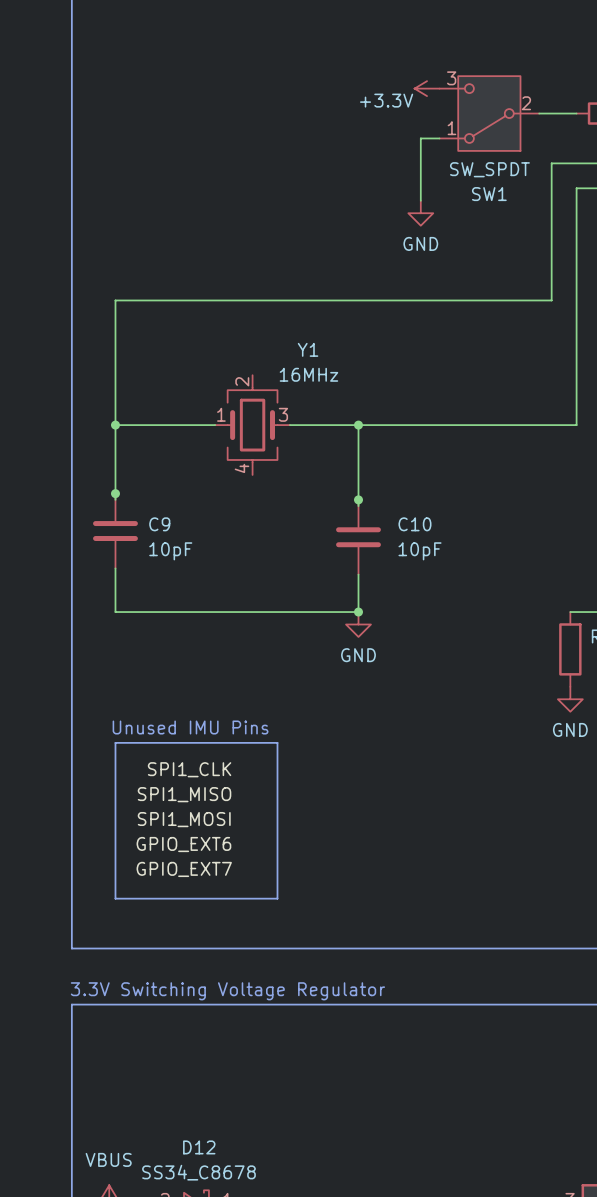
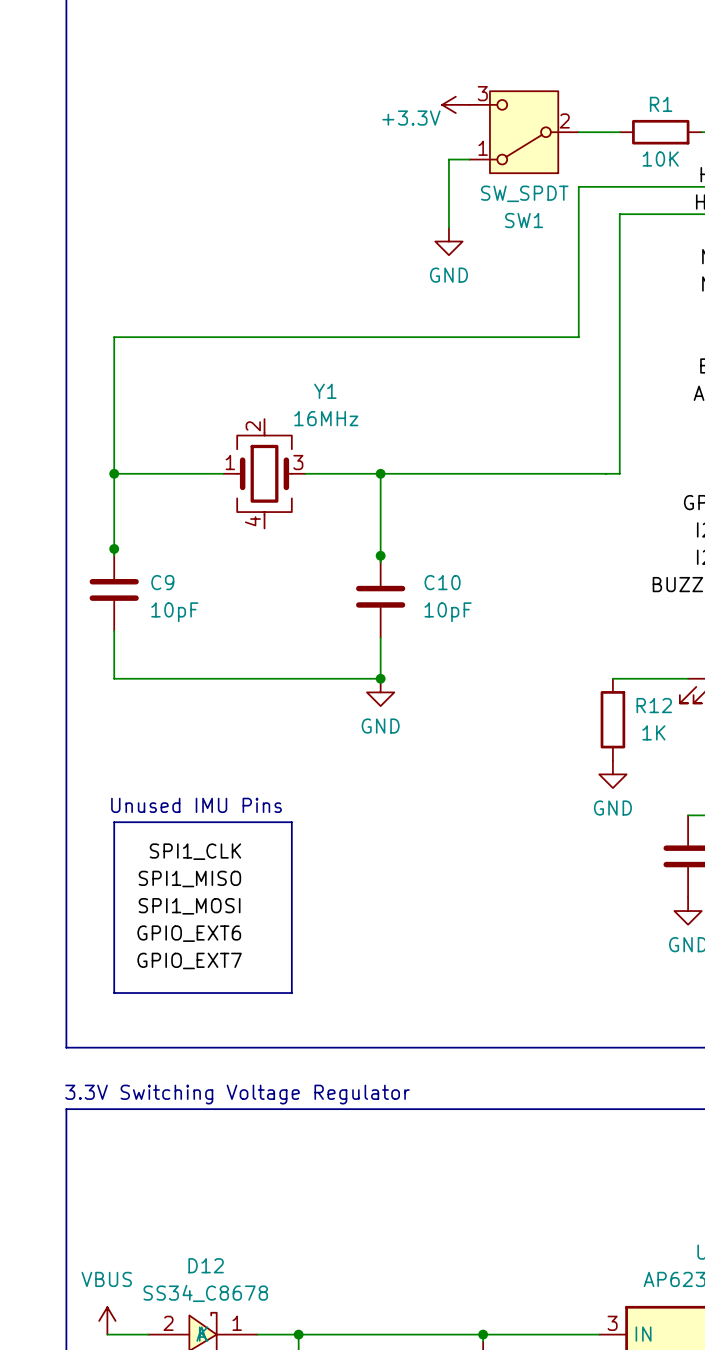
wire: (551, 163) (551, 300) (539, 300) -> (592, 186) (578, 186) (578, 337)

